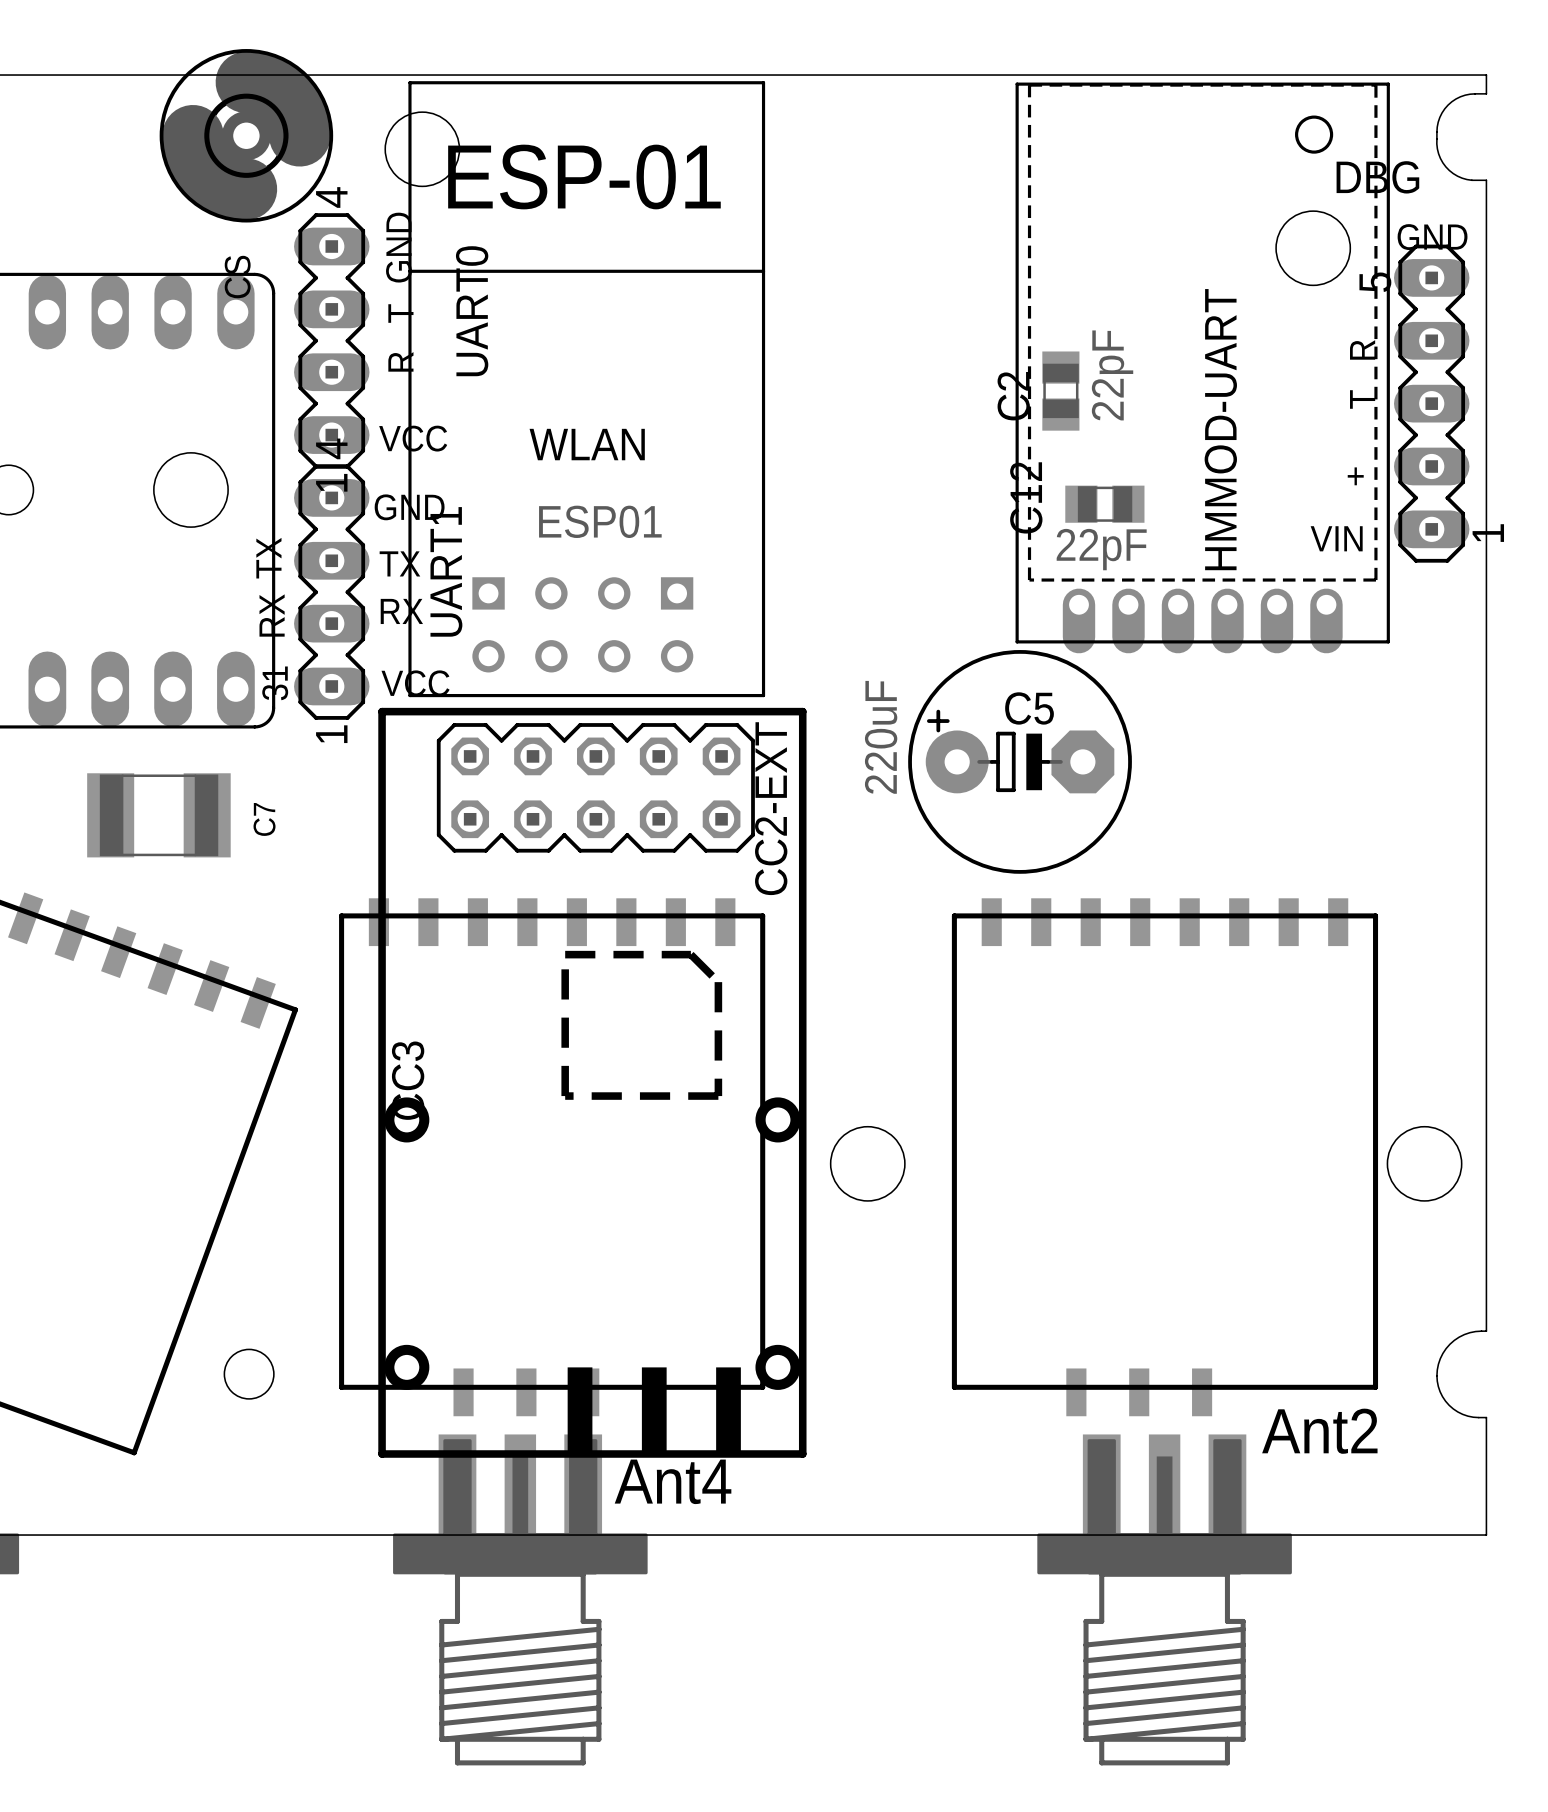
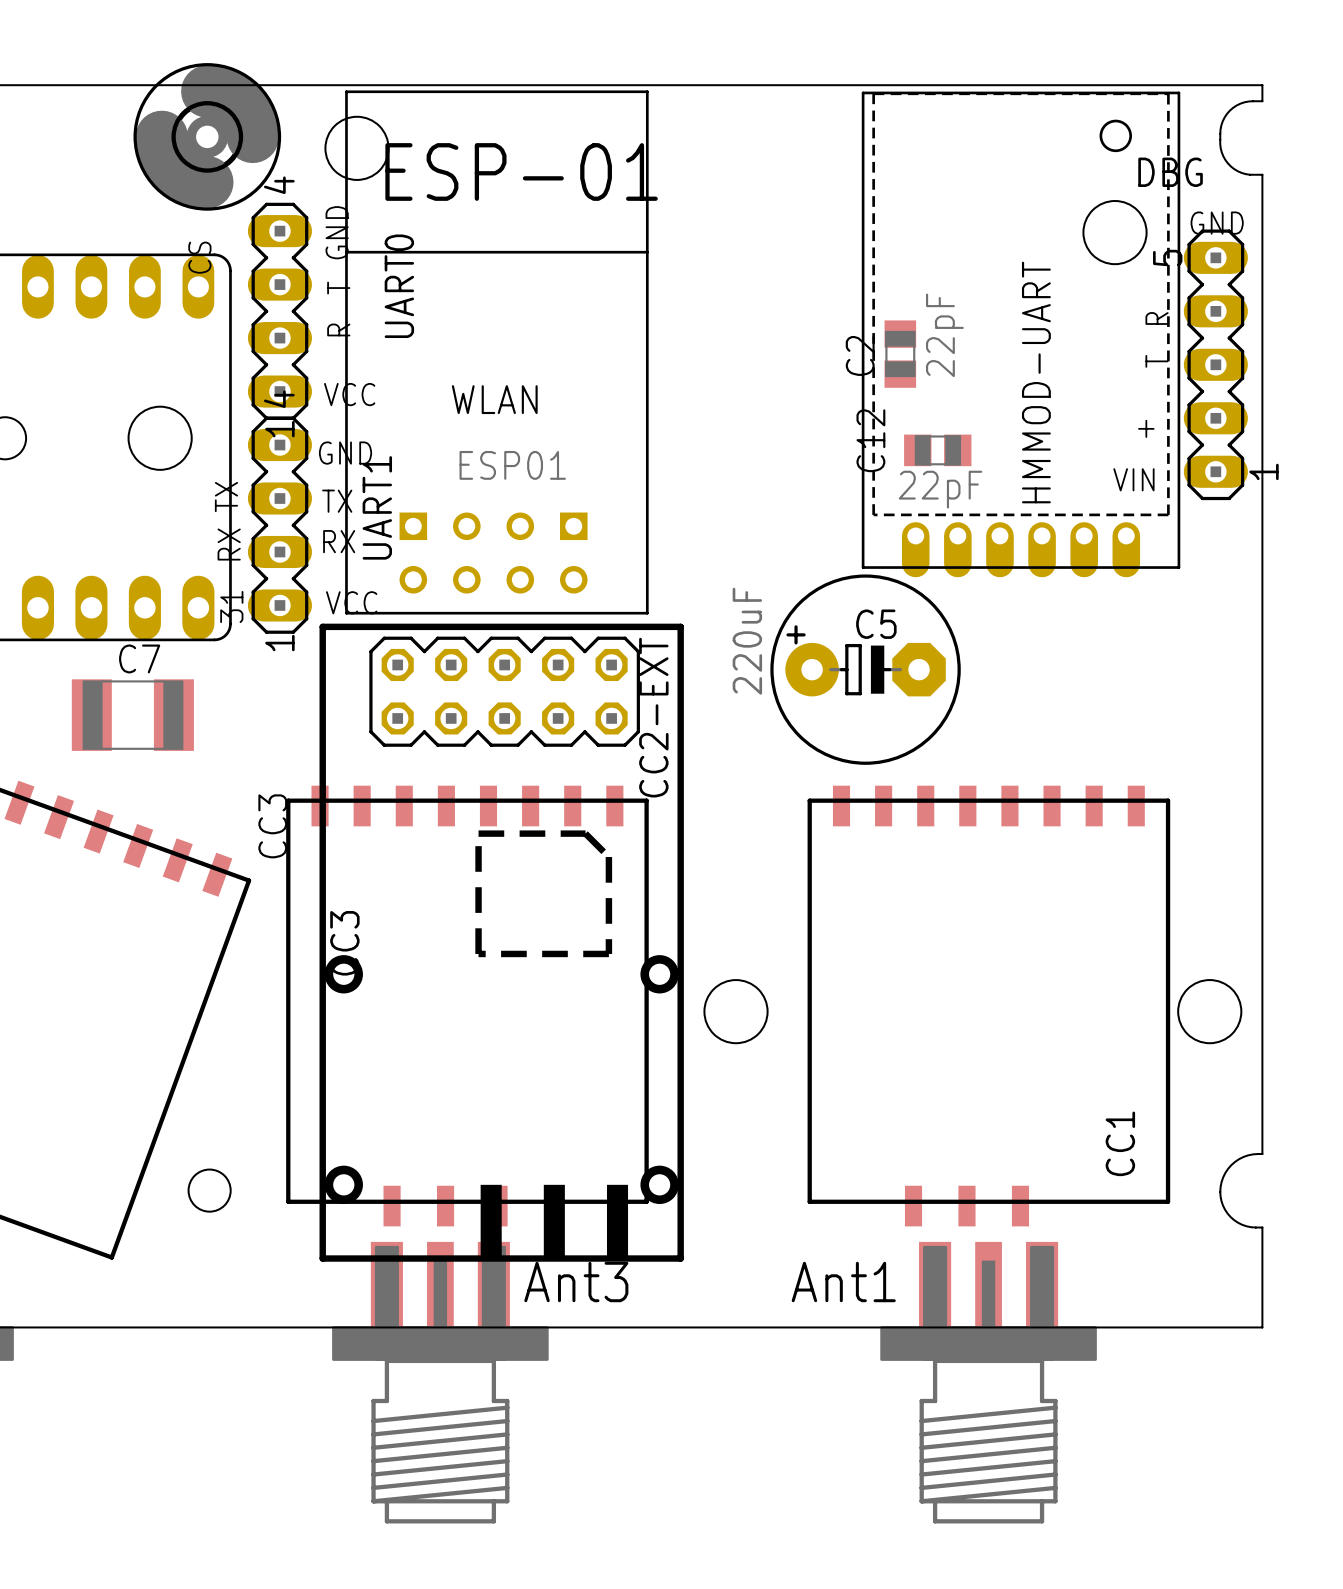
C7 name: none -> C7 (139, 658)
text: C7 (264, 819) -> none
text: none -> CC3 (272, 826)
CC1 name: none -> CC1 (1120, 1143)
text: Ant2 (1319, 1431) -> none
text: Ant4 (673, 1481) -> Ant3 (576, 1282)
text: none -> Ant1 (843, 1282)

